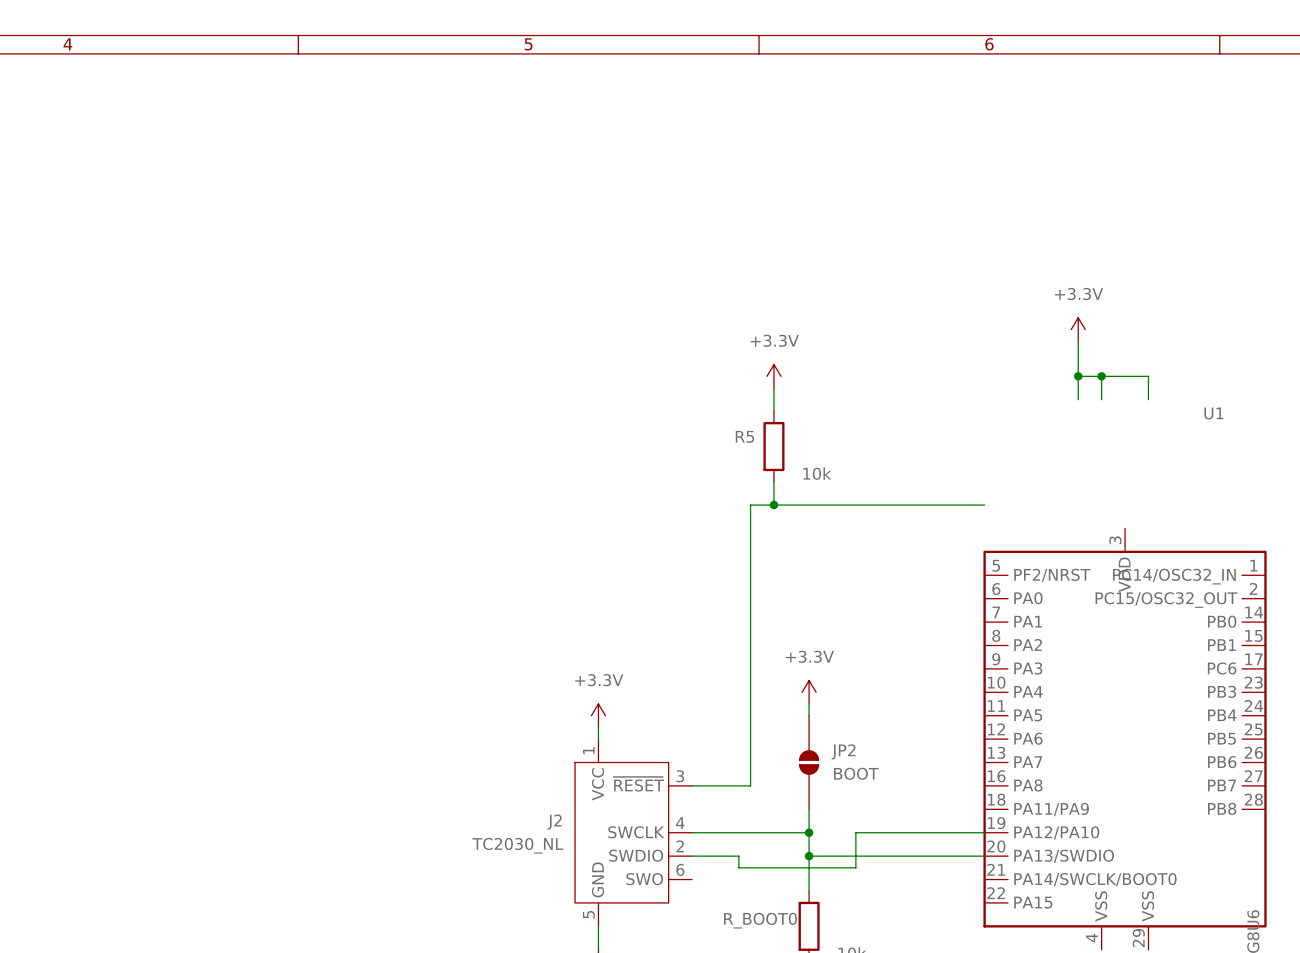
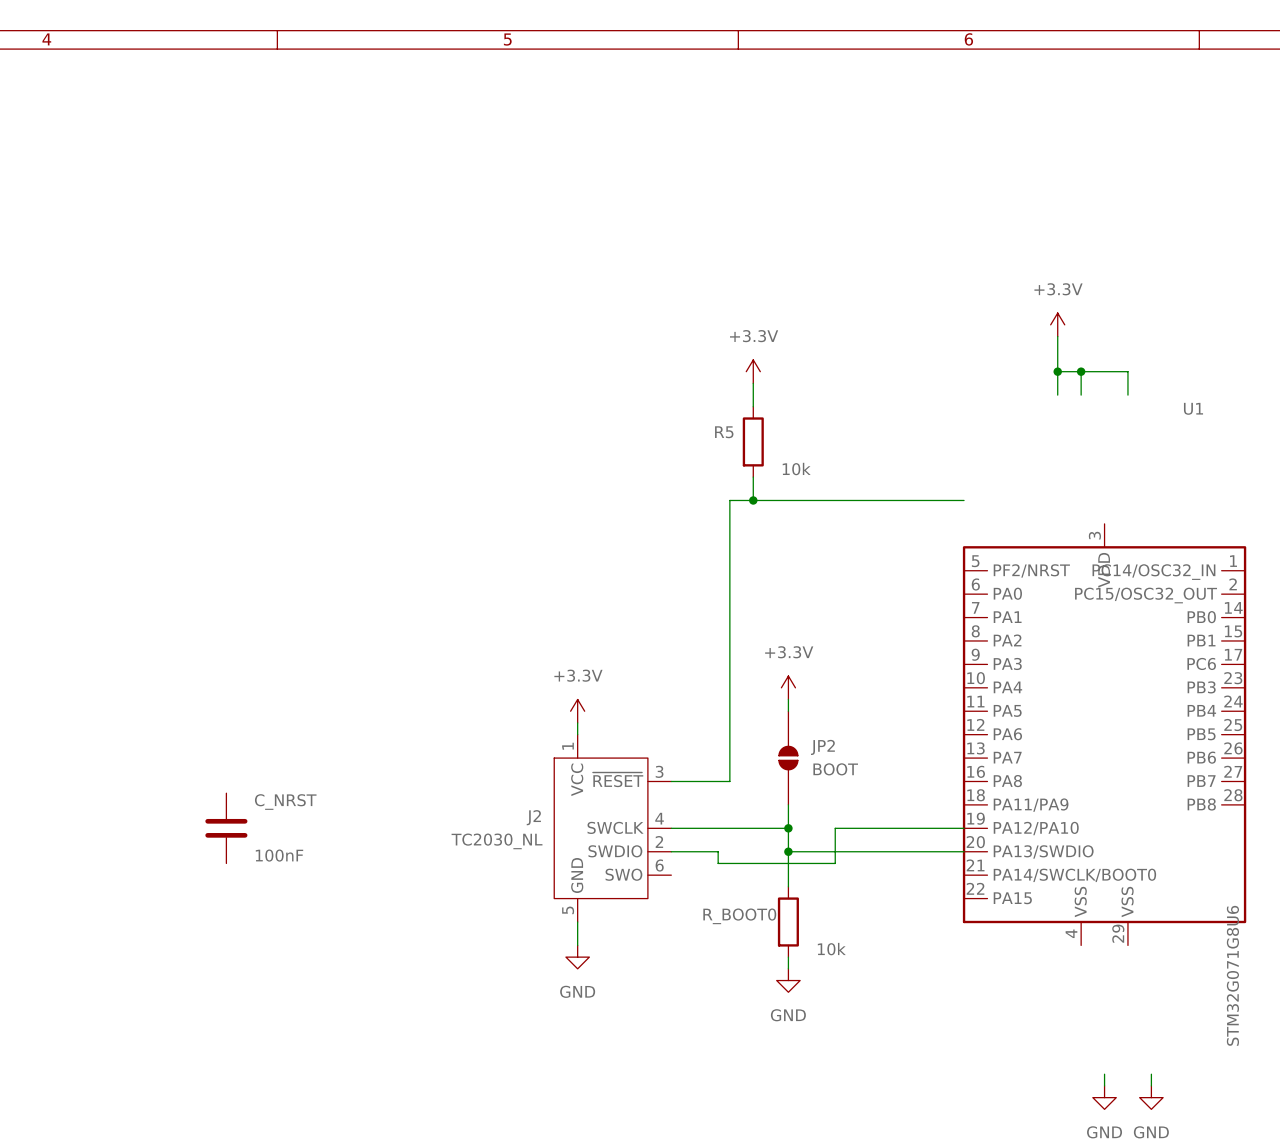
C_NRST: none -> 100nF (226, 828)

